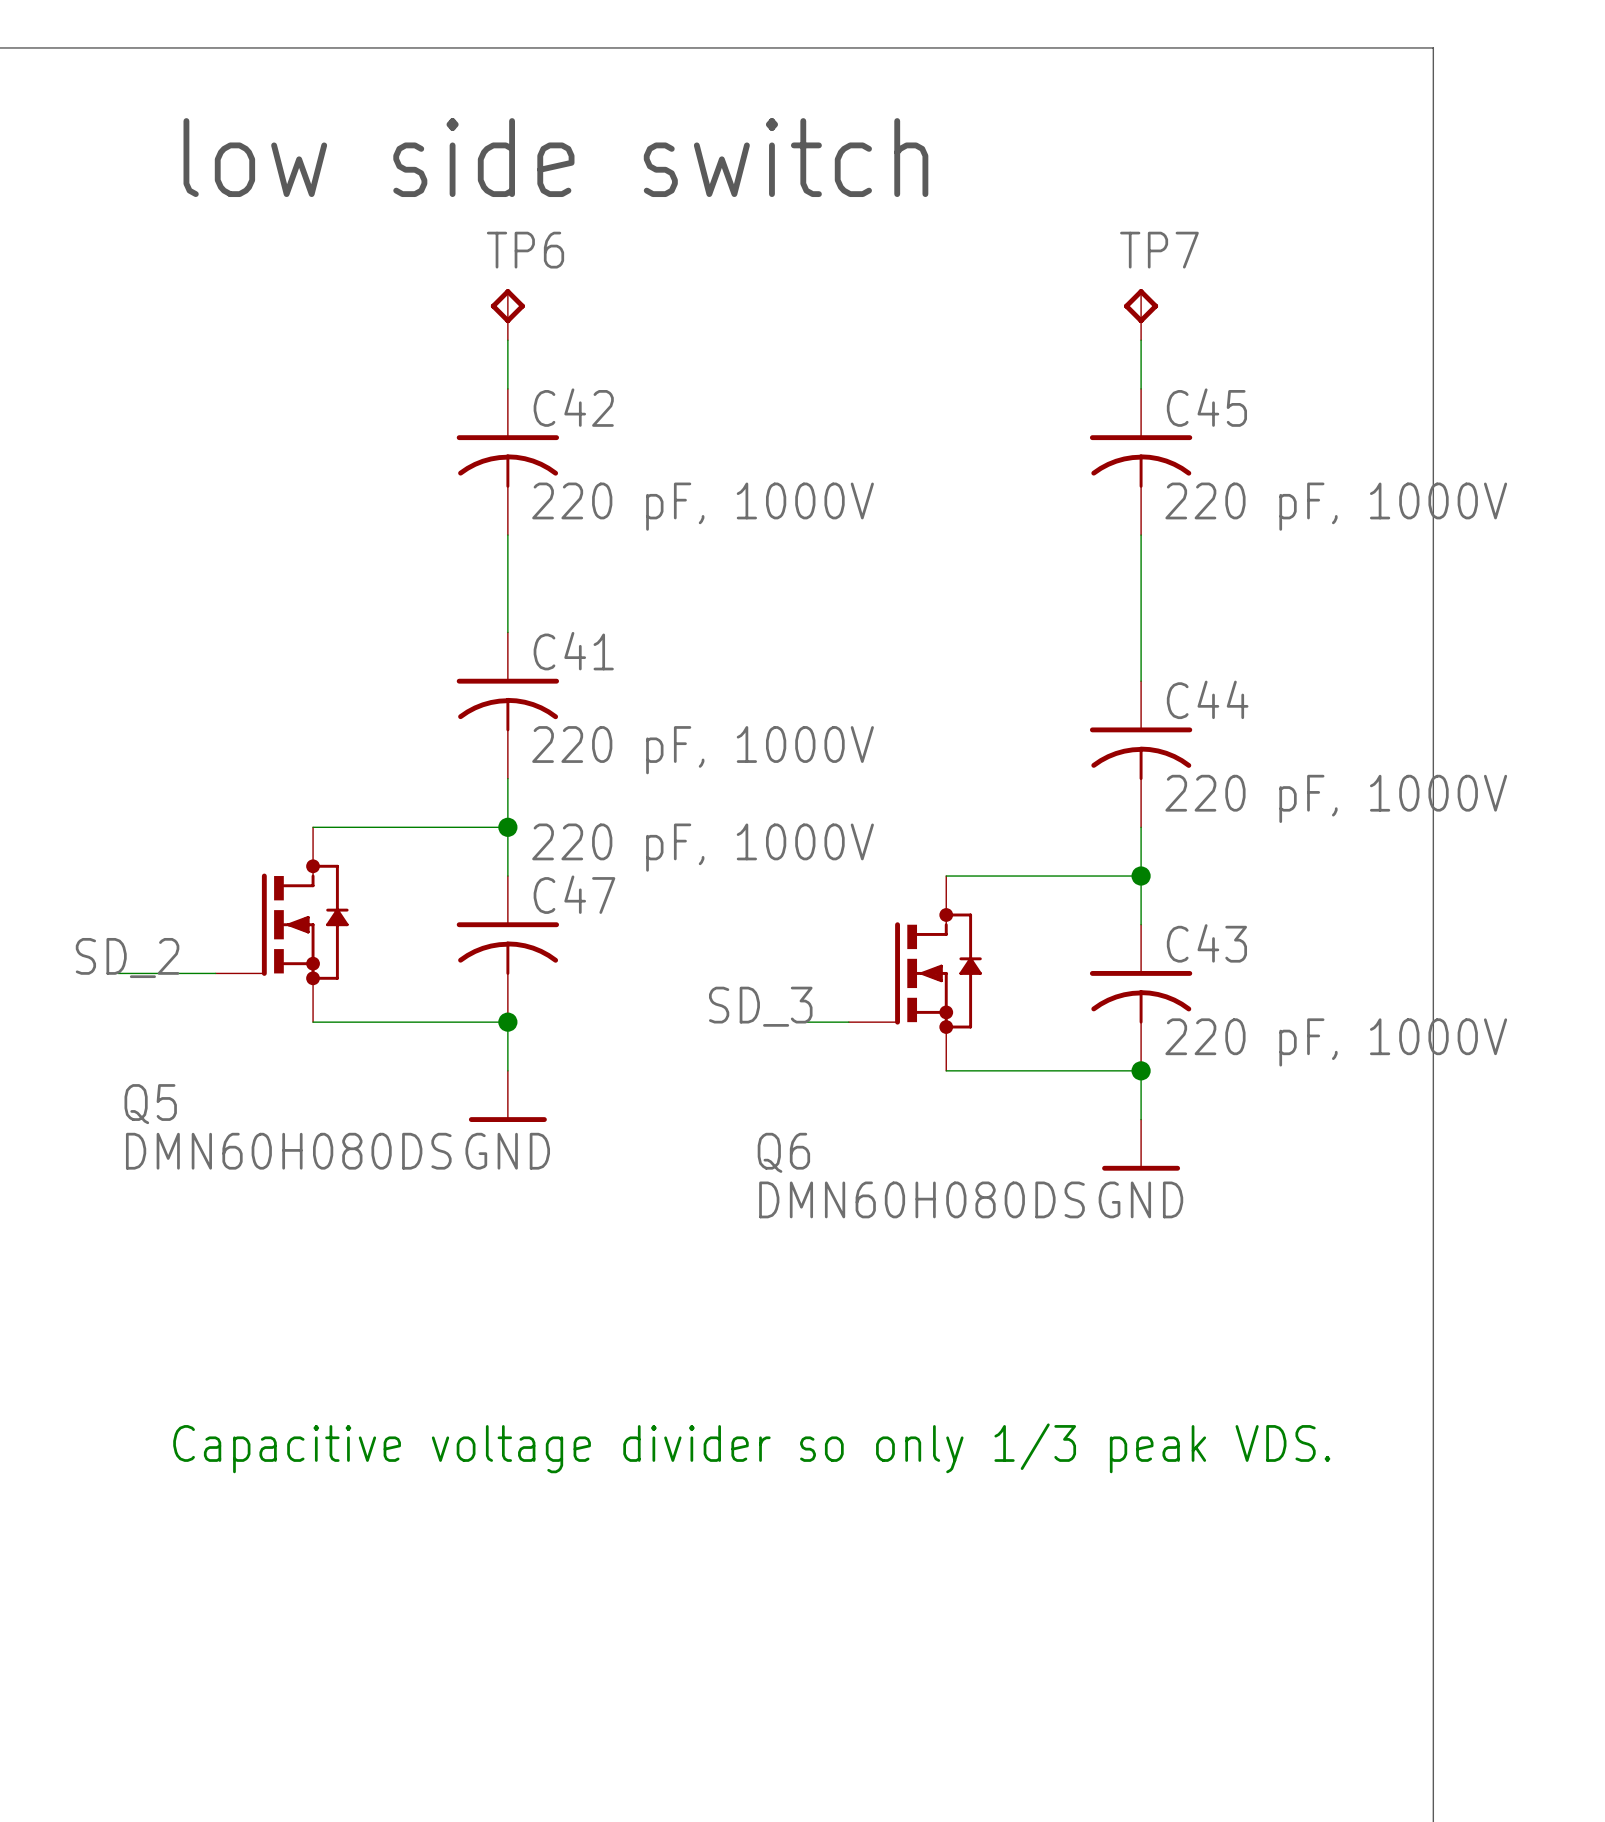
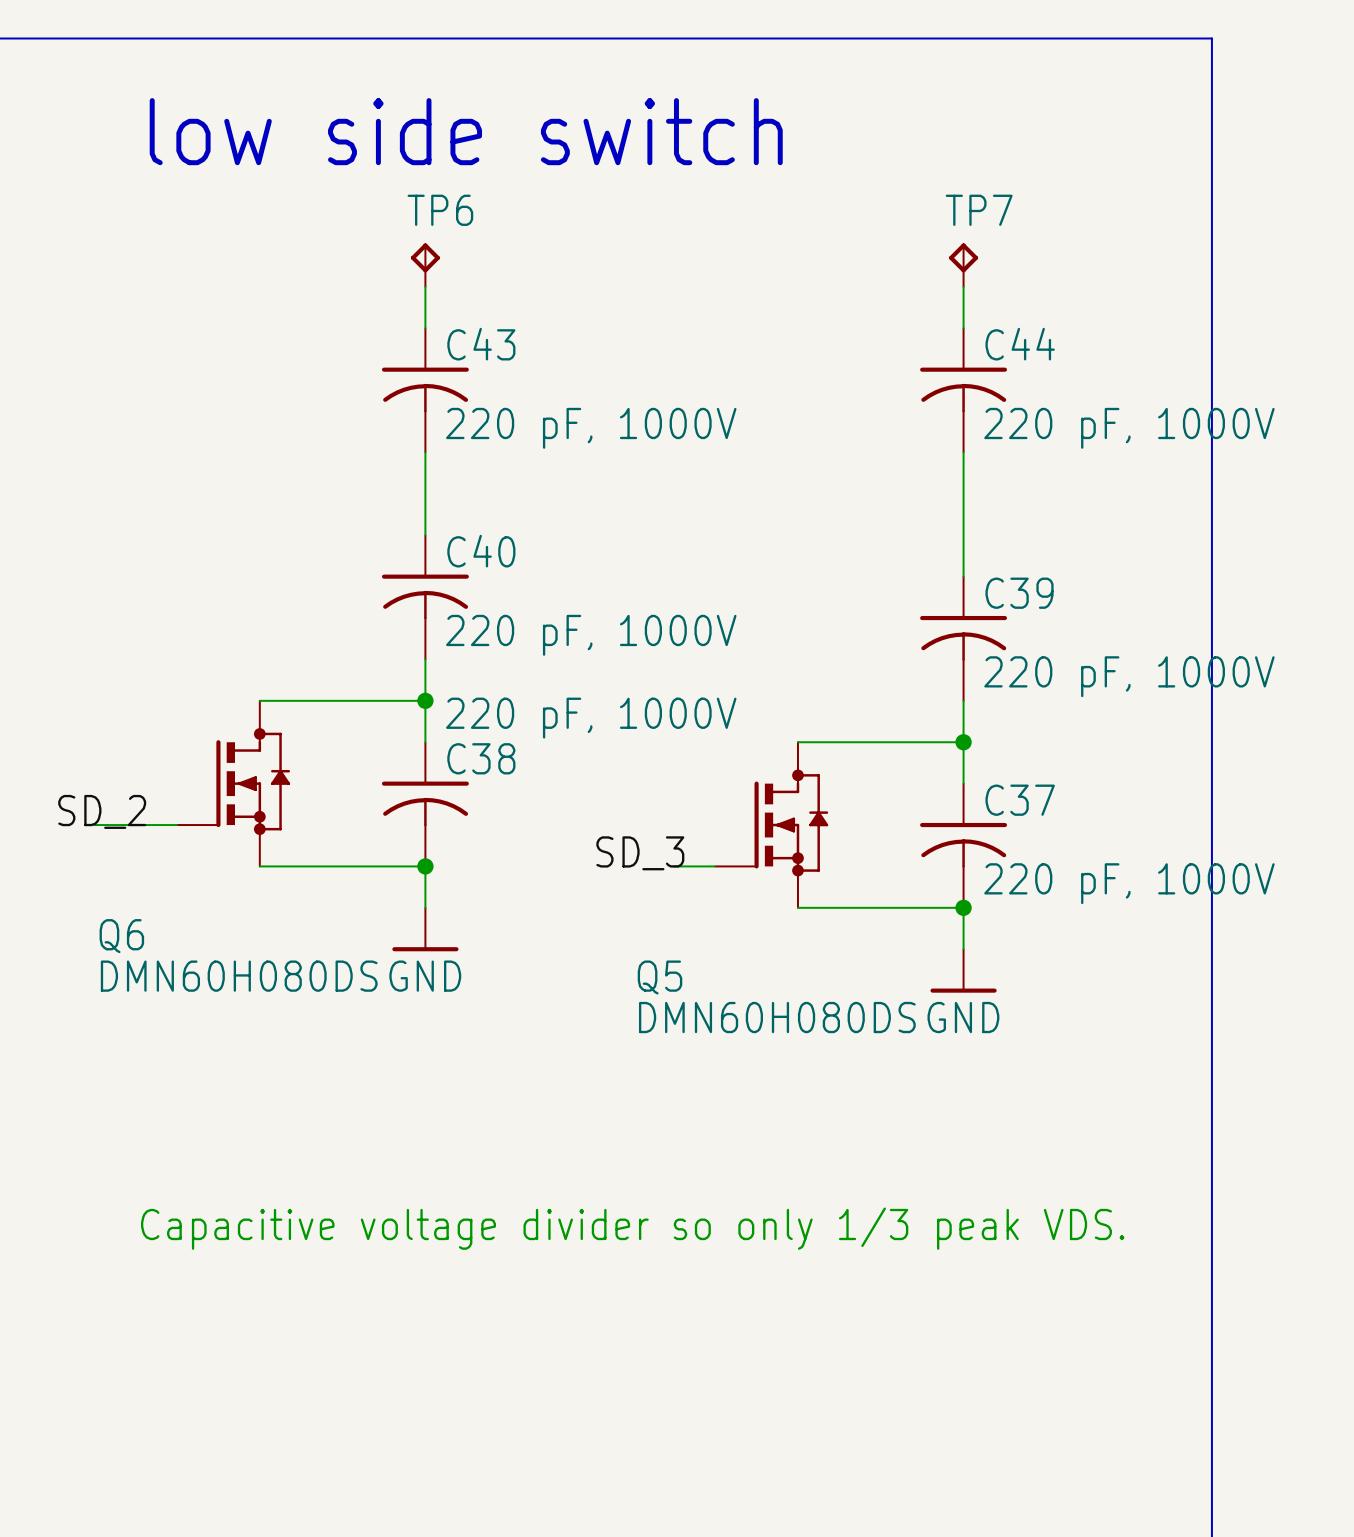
C42 name: C42 (573, 407) -> C43 (481, 344)
C45 name: C45 (1206, 407) -> C44 (1020, 344)
C41 name: C41 (573, 651) -> C40 (481, 551)
C44 name: C44 (1207, 699) -> C39 (1019, 593)
C47 name: C47 (574, 894) -> C38 (481, 758)
C43 name: C43 (1206, 943) -> C37 (1020, 800)
Q5 name: Q5 (150, 1104) -> Q6 (121, 936)
Q6 name: Q6 (783, 1152) -> Q5 (660, 977)

